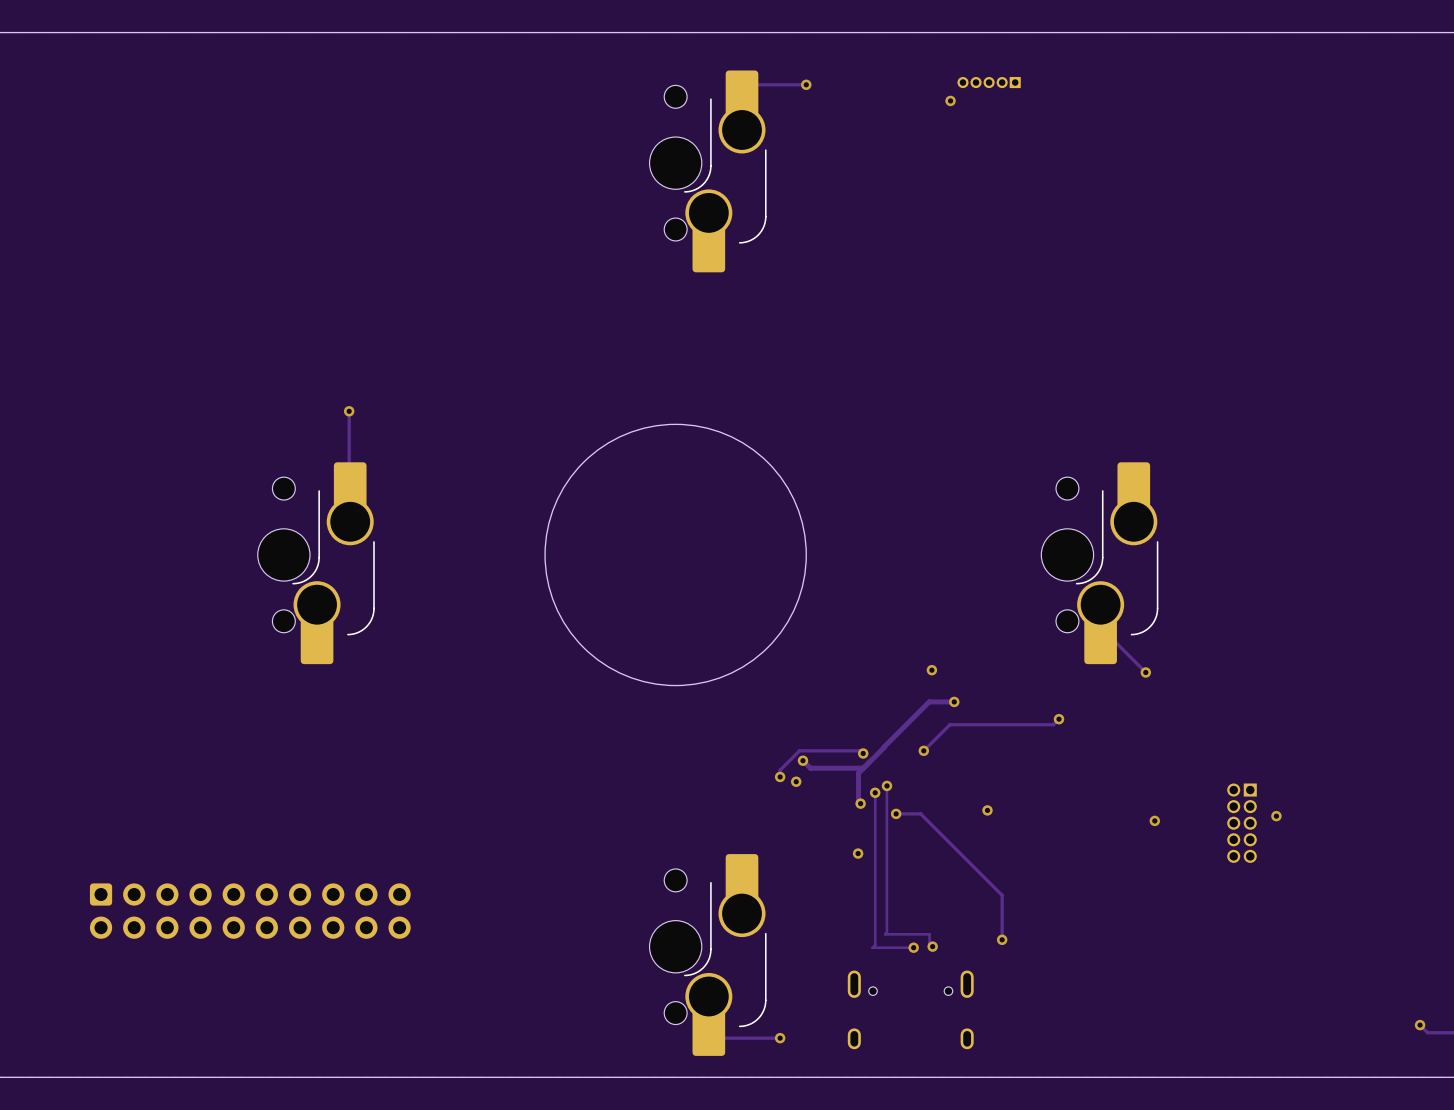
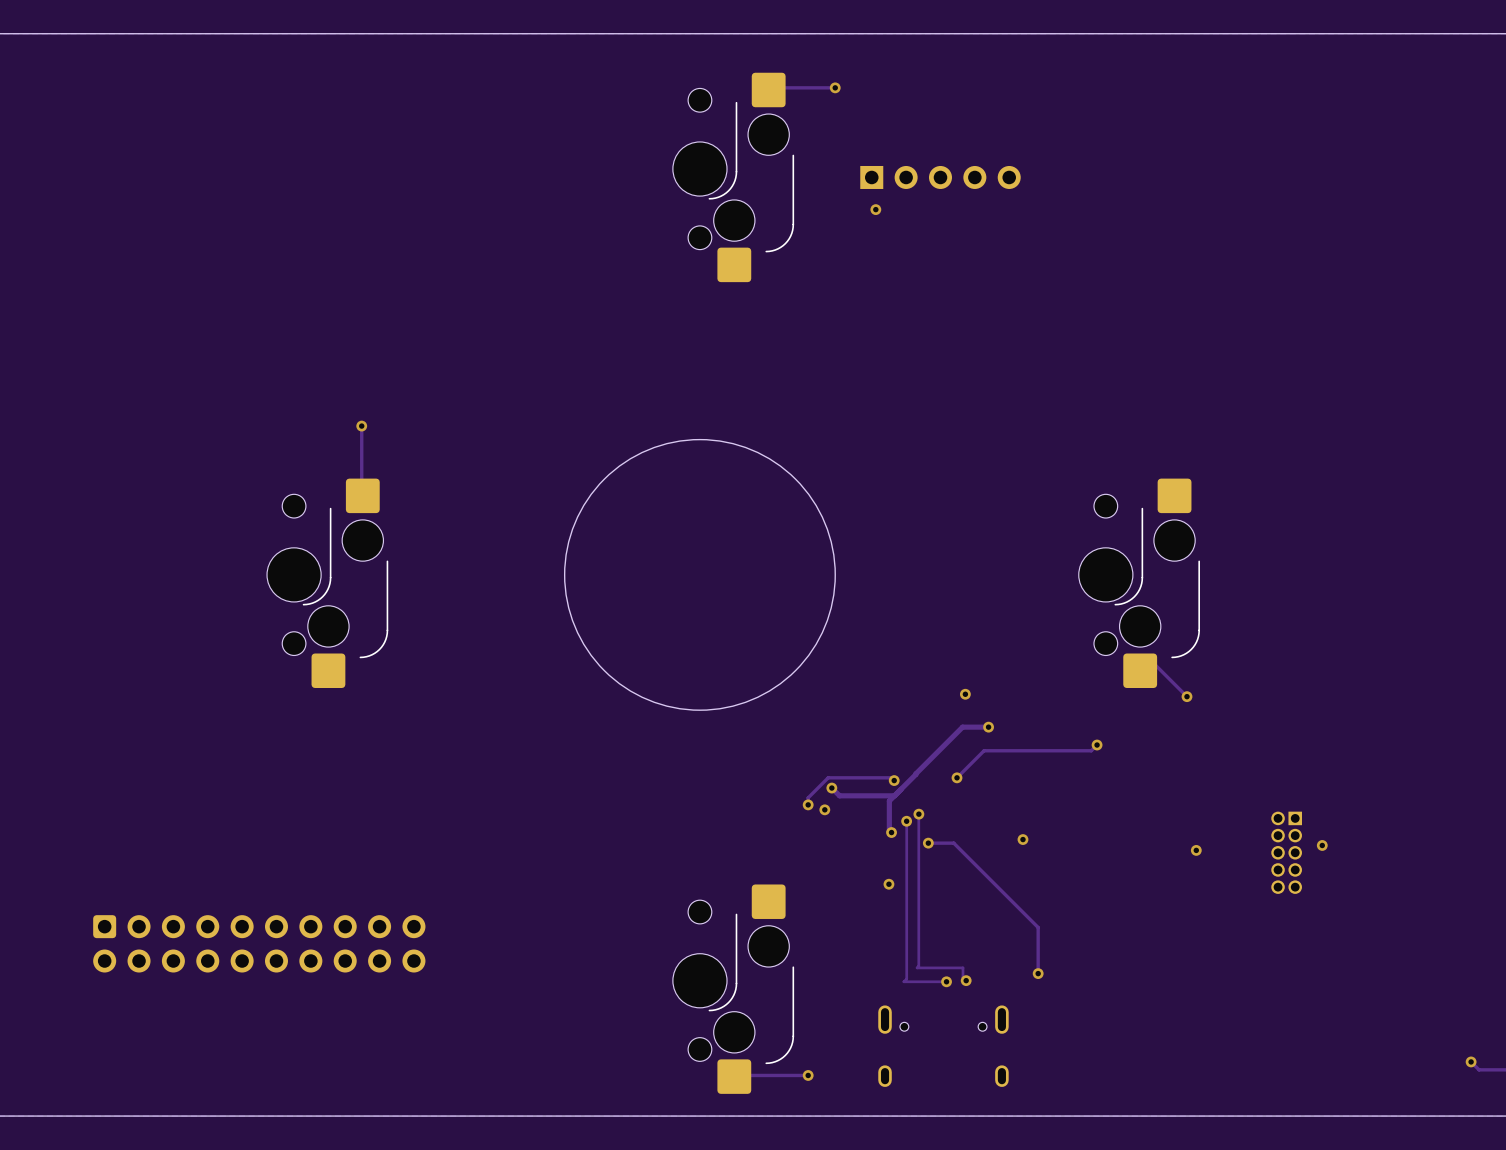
part footprint: [649, 70, 767, 273] -> [672, 72, 795, 283]
part: (989, 82) -> none
via: (950, 100) -> none
part: none -> (940, 177)
via: none -> (875, 209)
part footprint: [257, 462, 375, 665] -> [267, 478, 389, 688]
part footprint: [1041, 462, 1159, 665] -> [1078, 478, 1200, 688]
part footprint: [649, 854, 767, 1056] -> [672, 884, 795, 1094]

